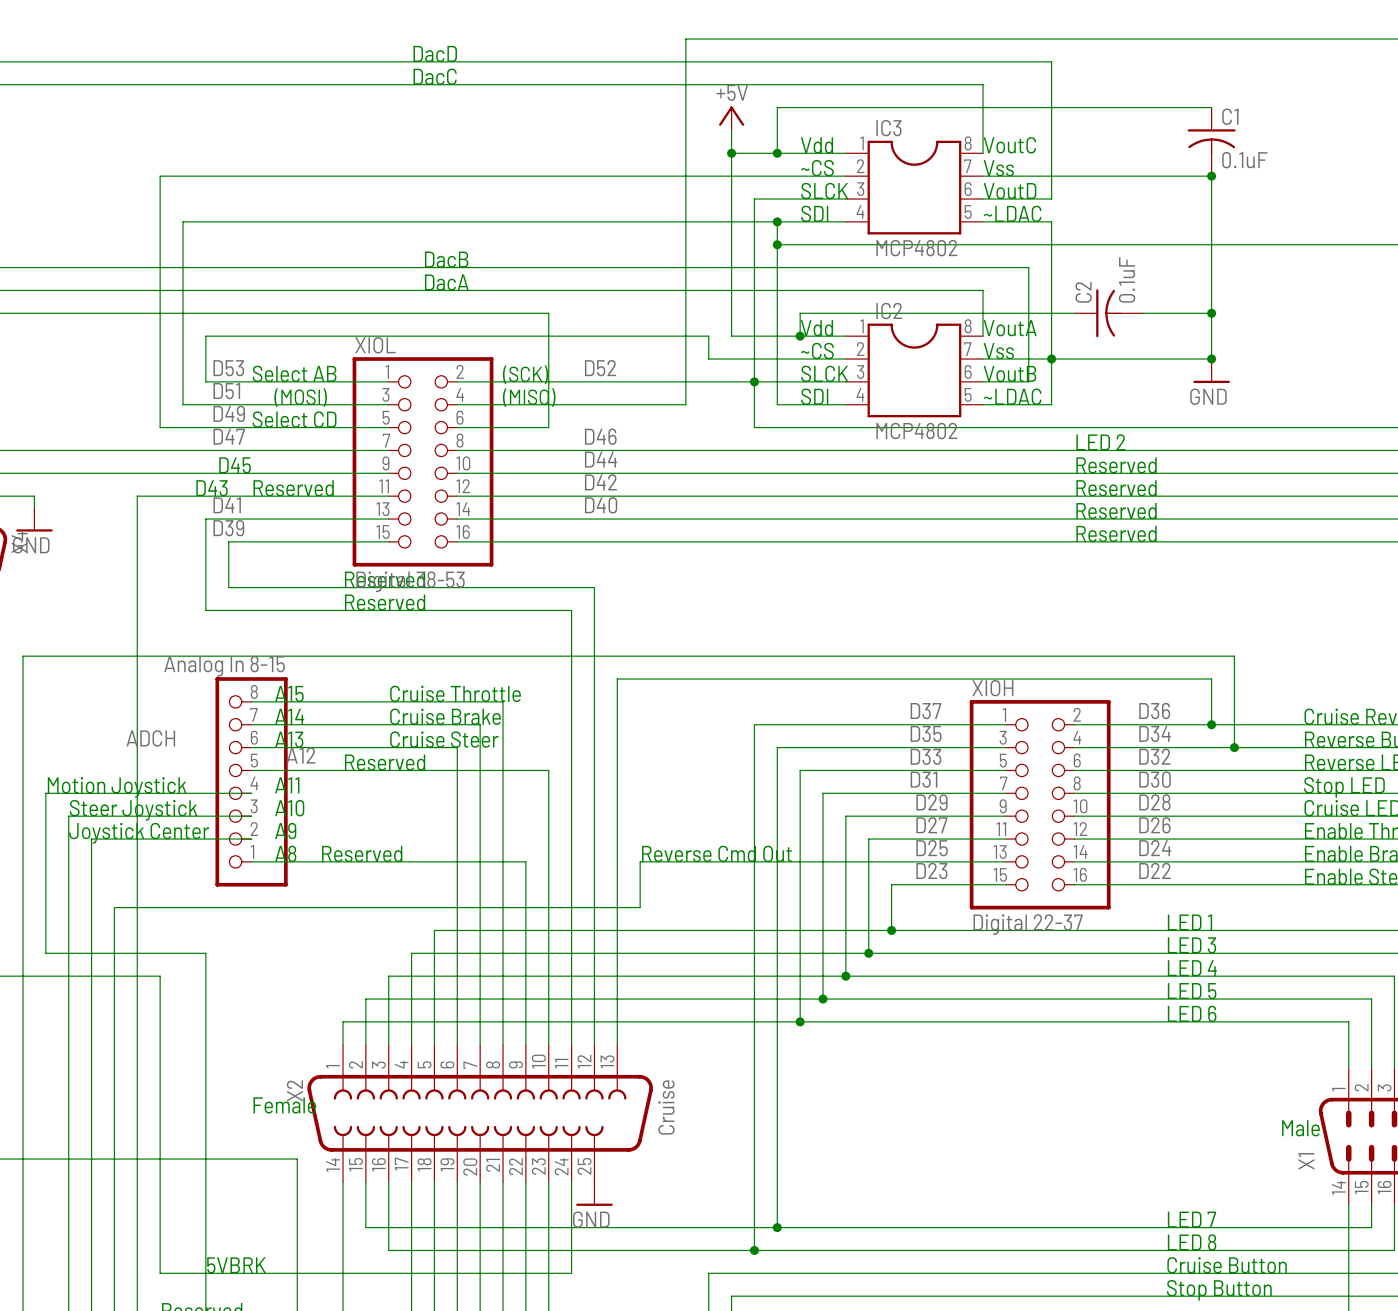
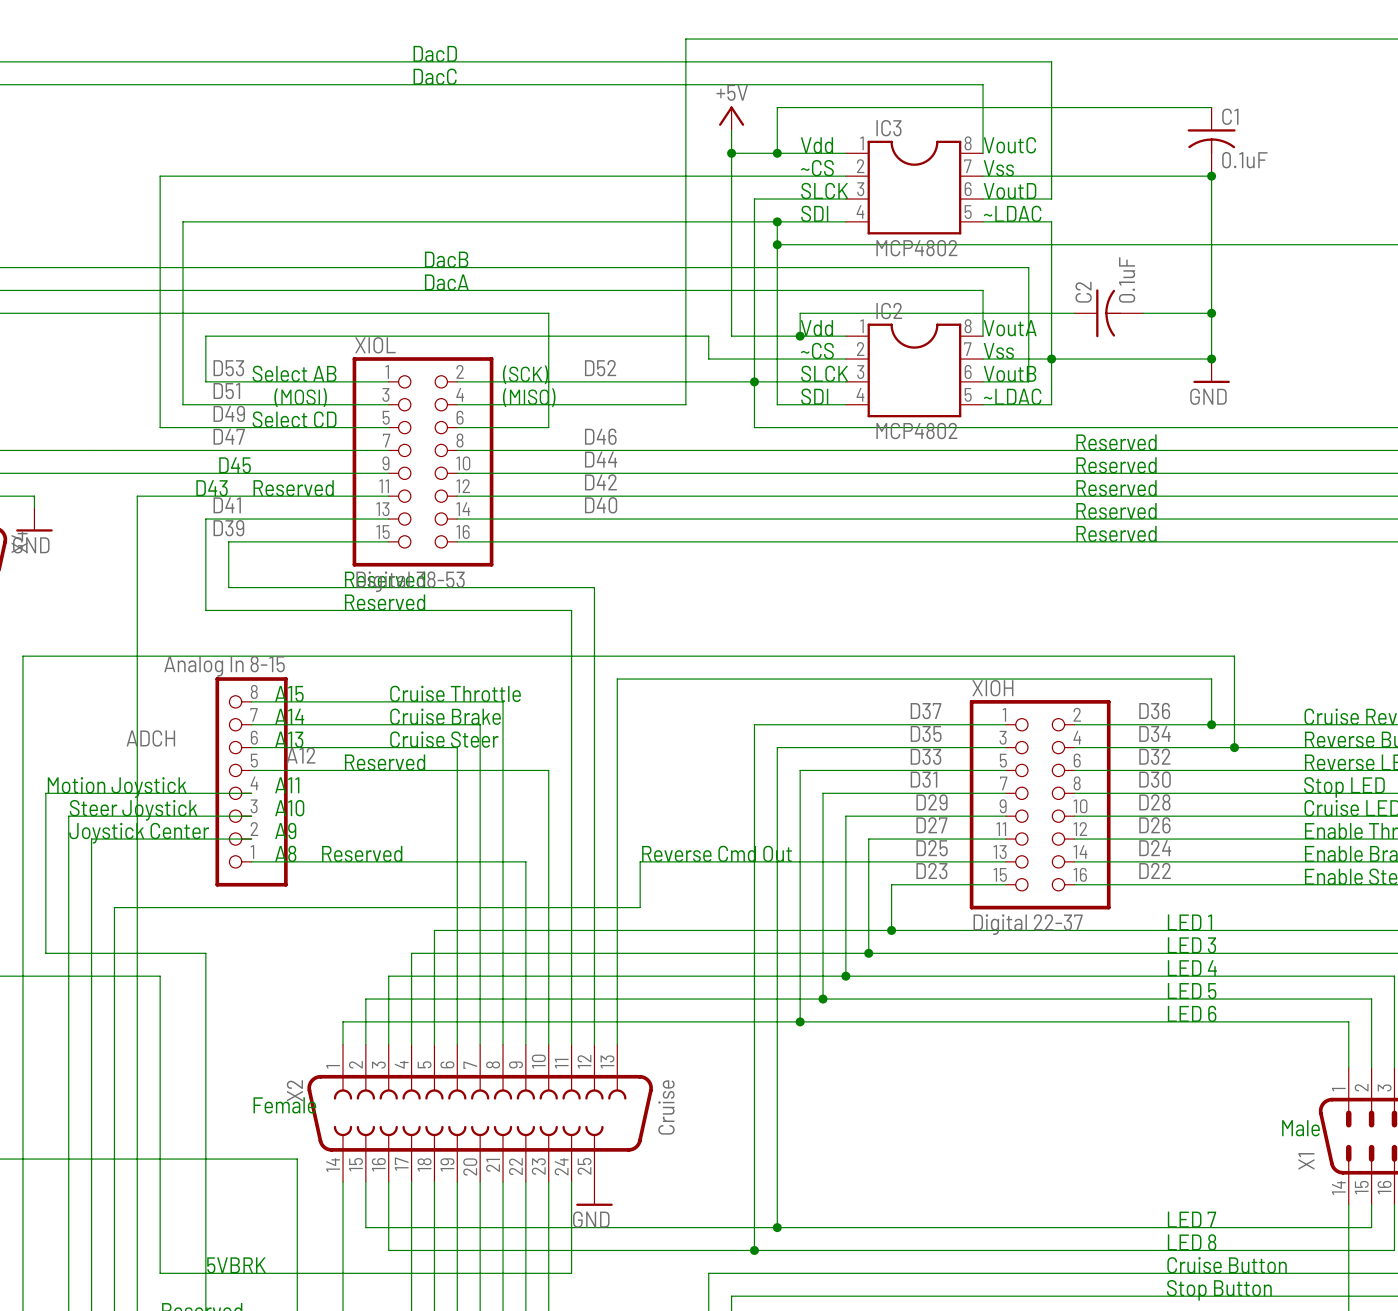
text: LED 2 (1100, 442) -> Reserved (1116, 442)

